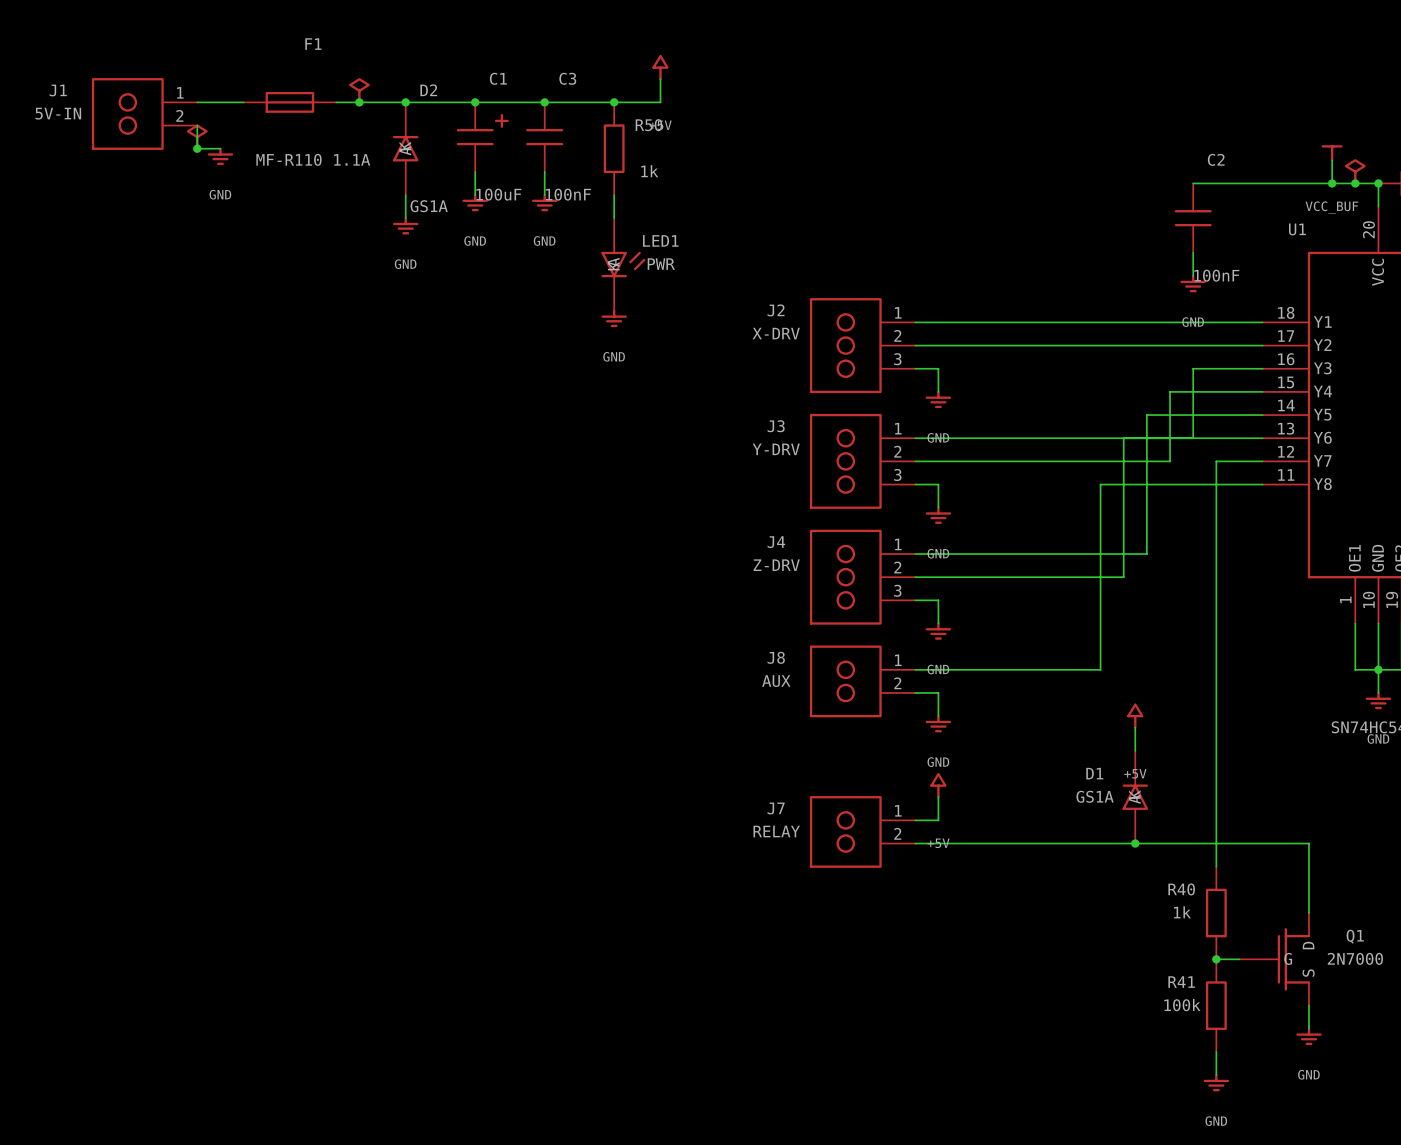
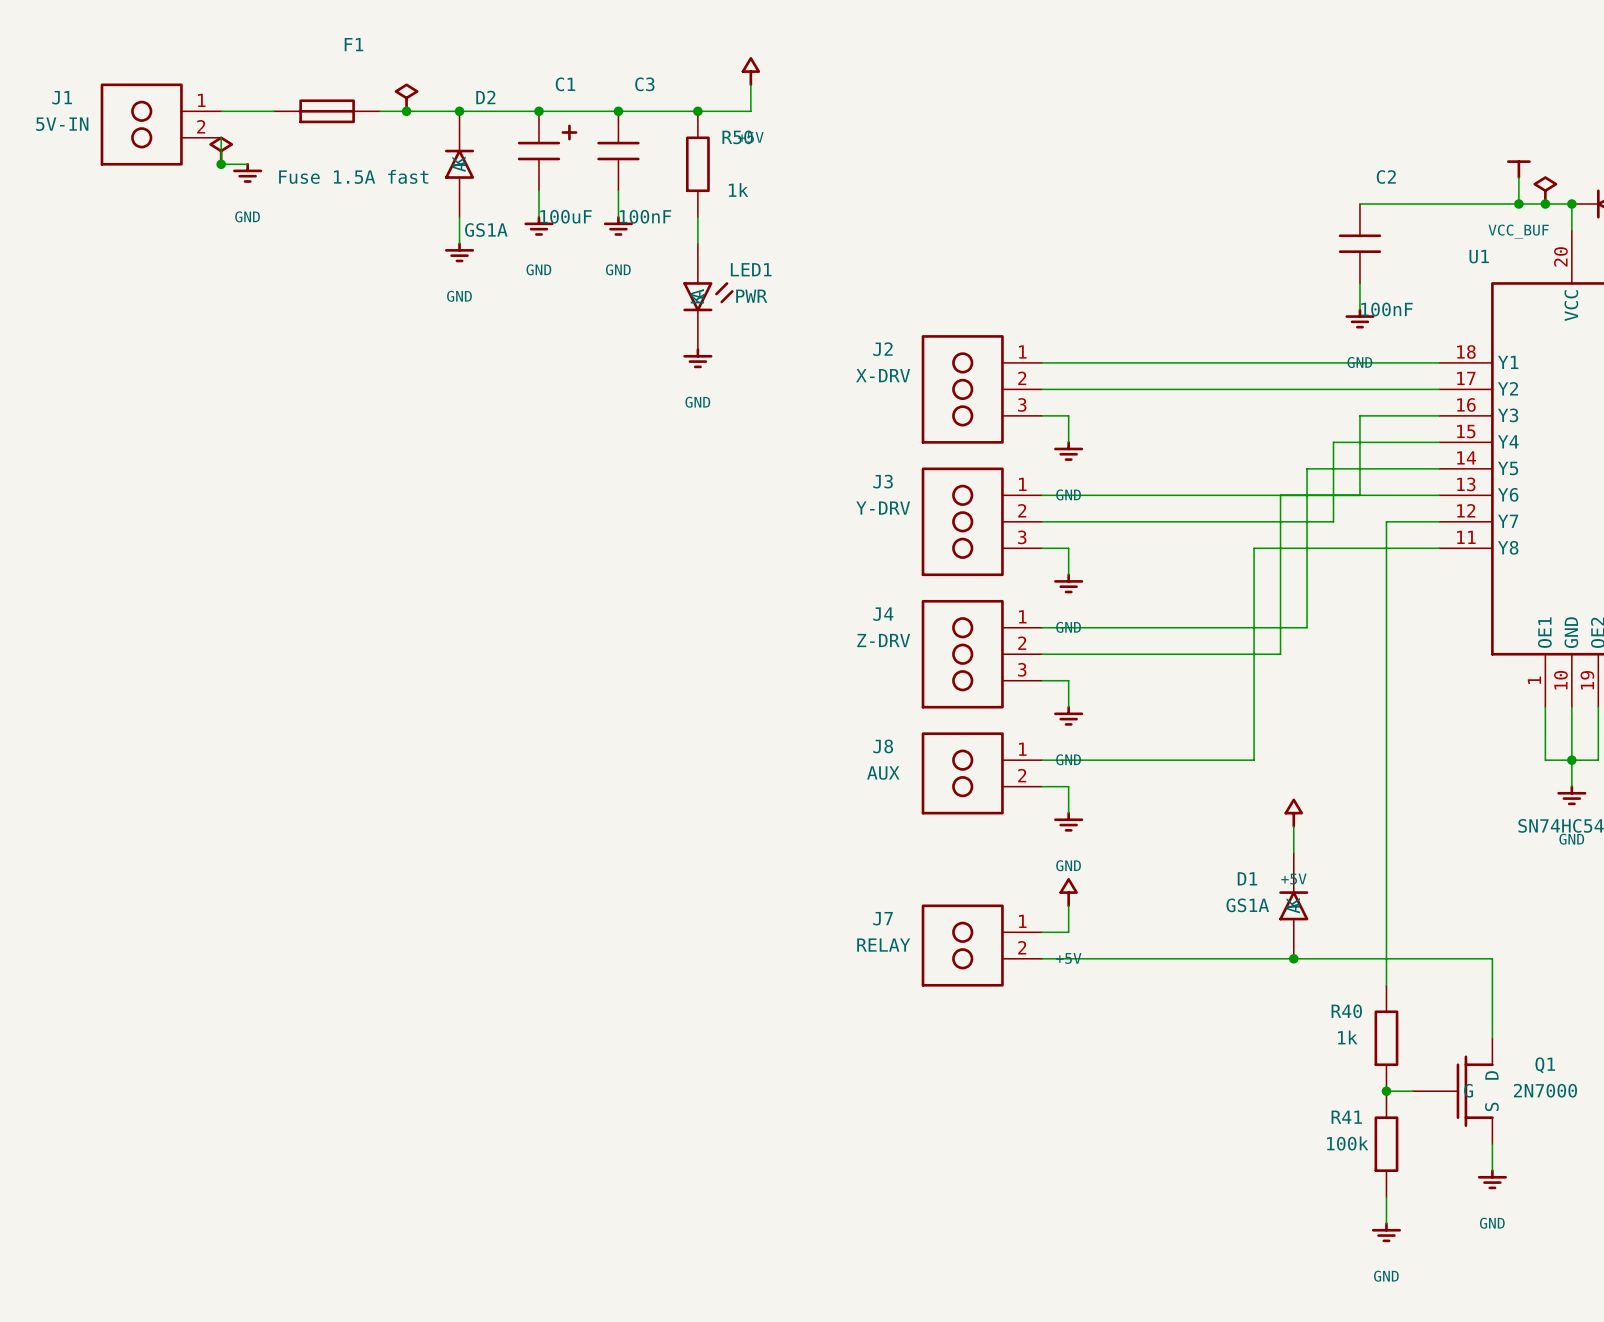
F1 value: MF-R110 1.1A (313, 159) -> Fuse 1.5A fast (353, 176)

